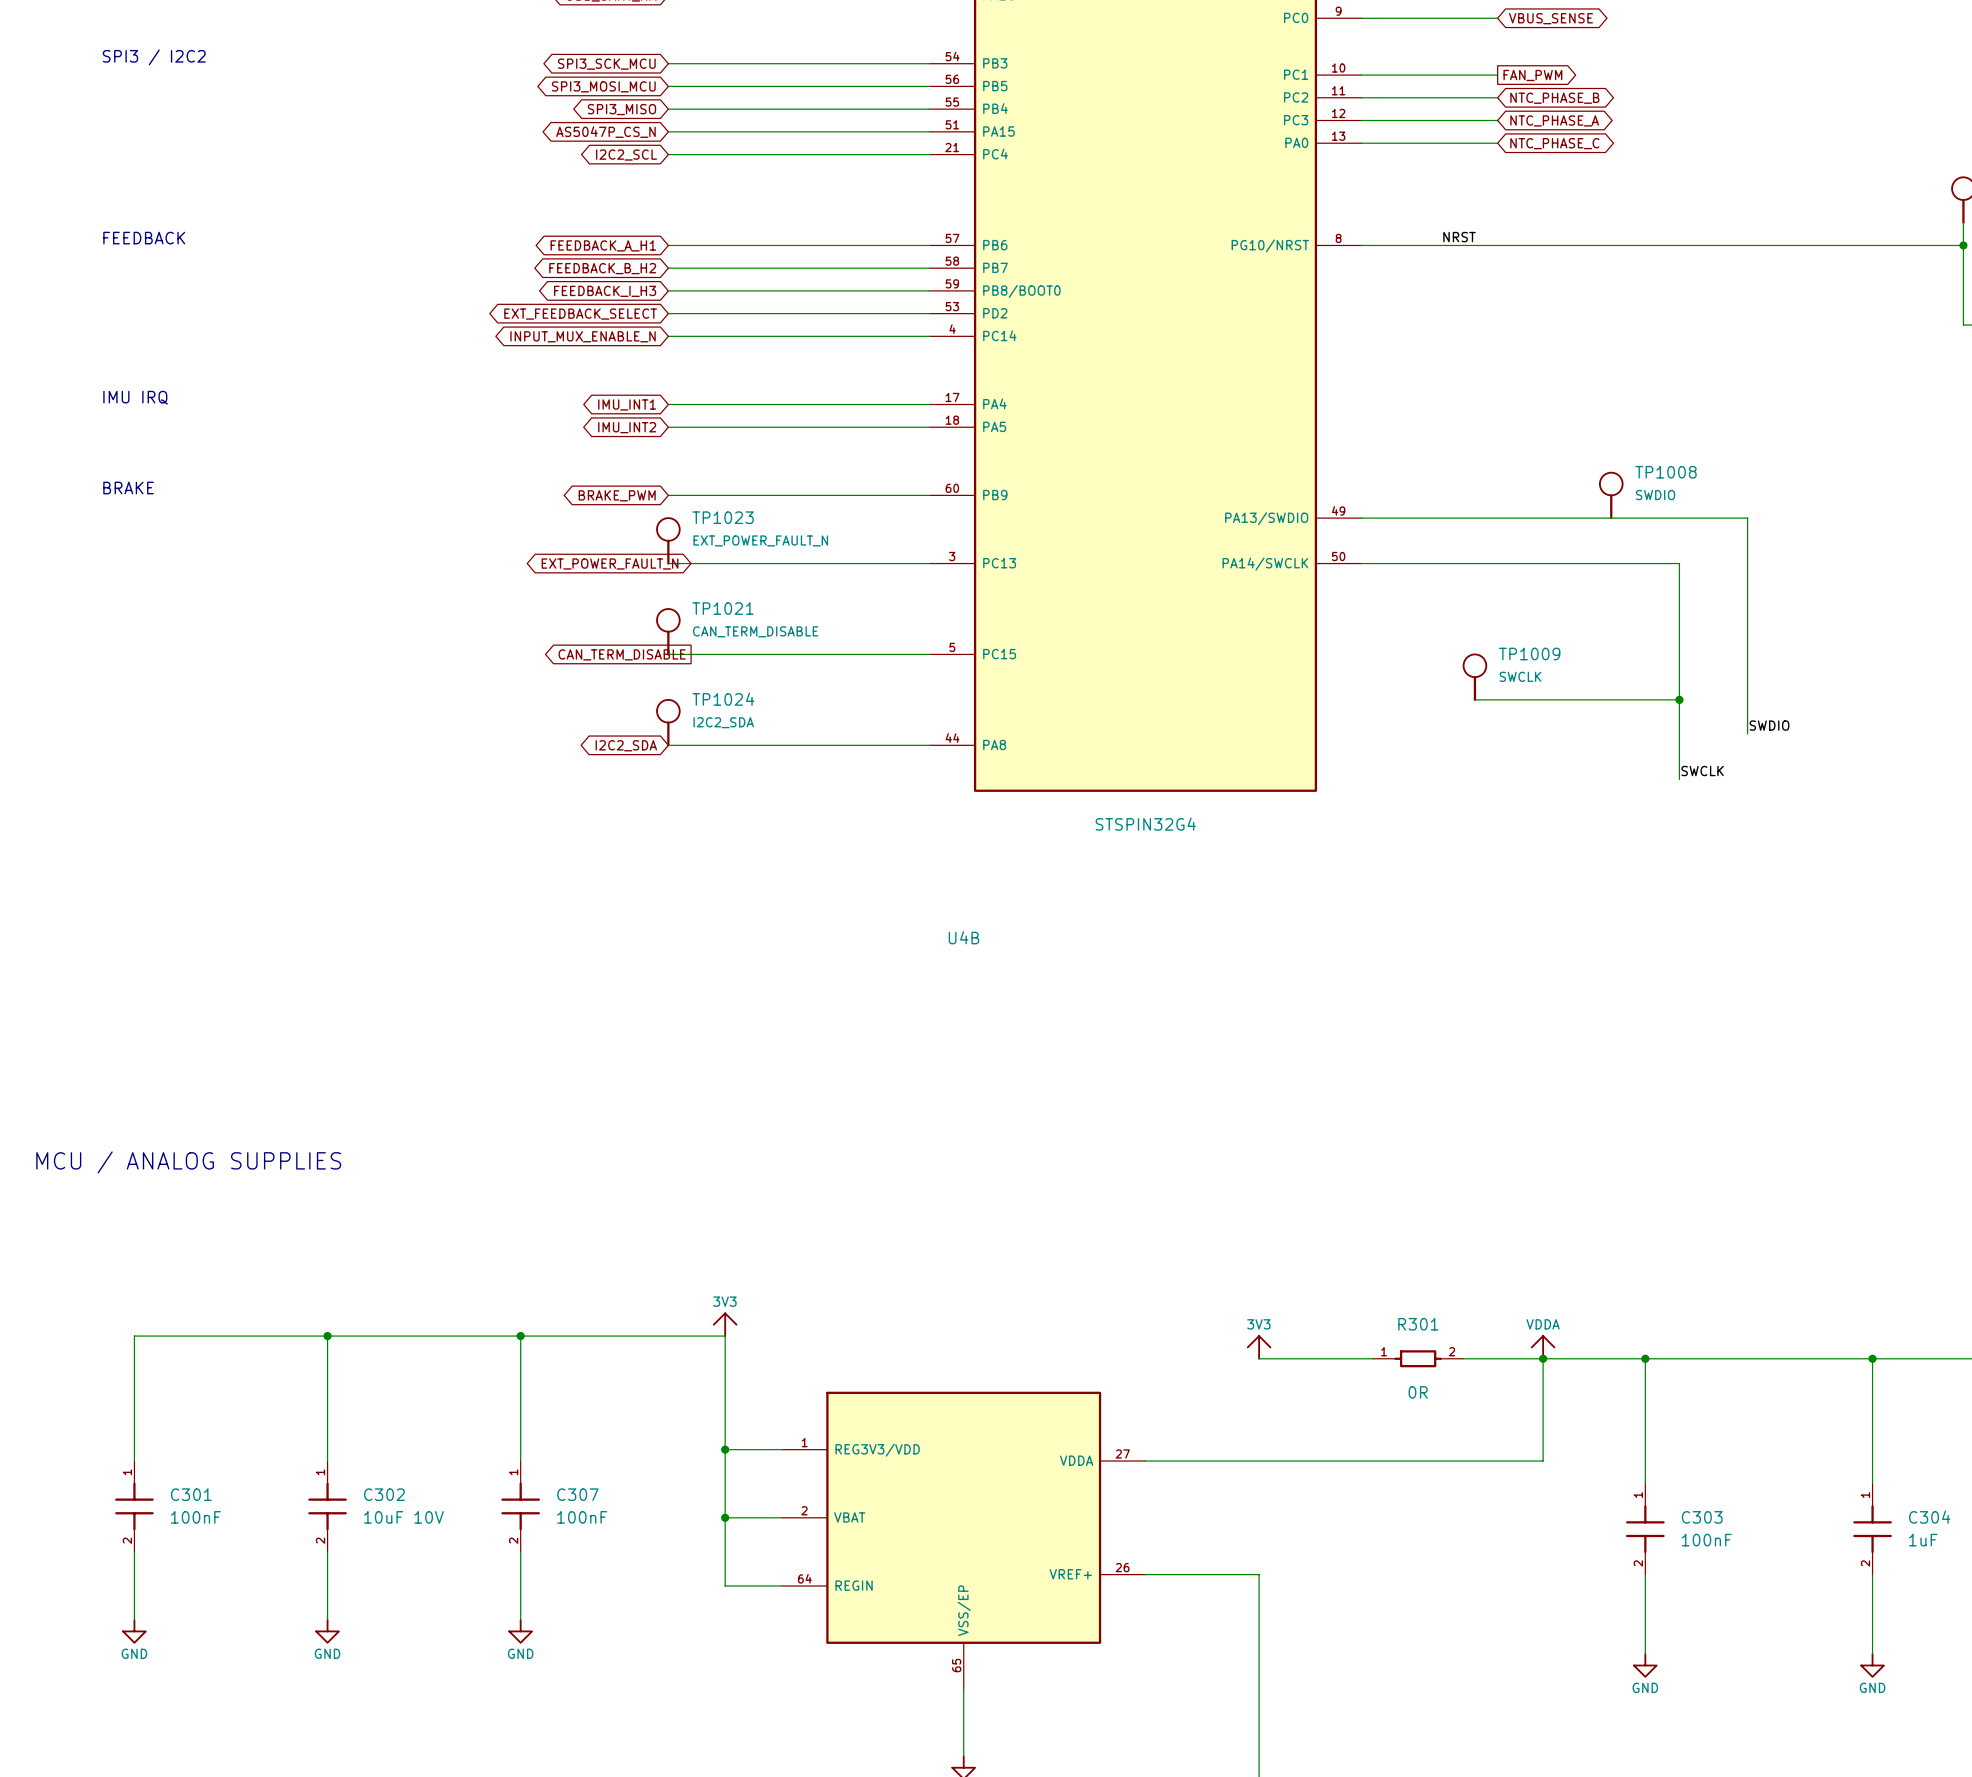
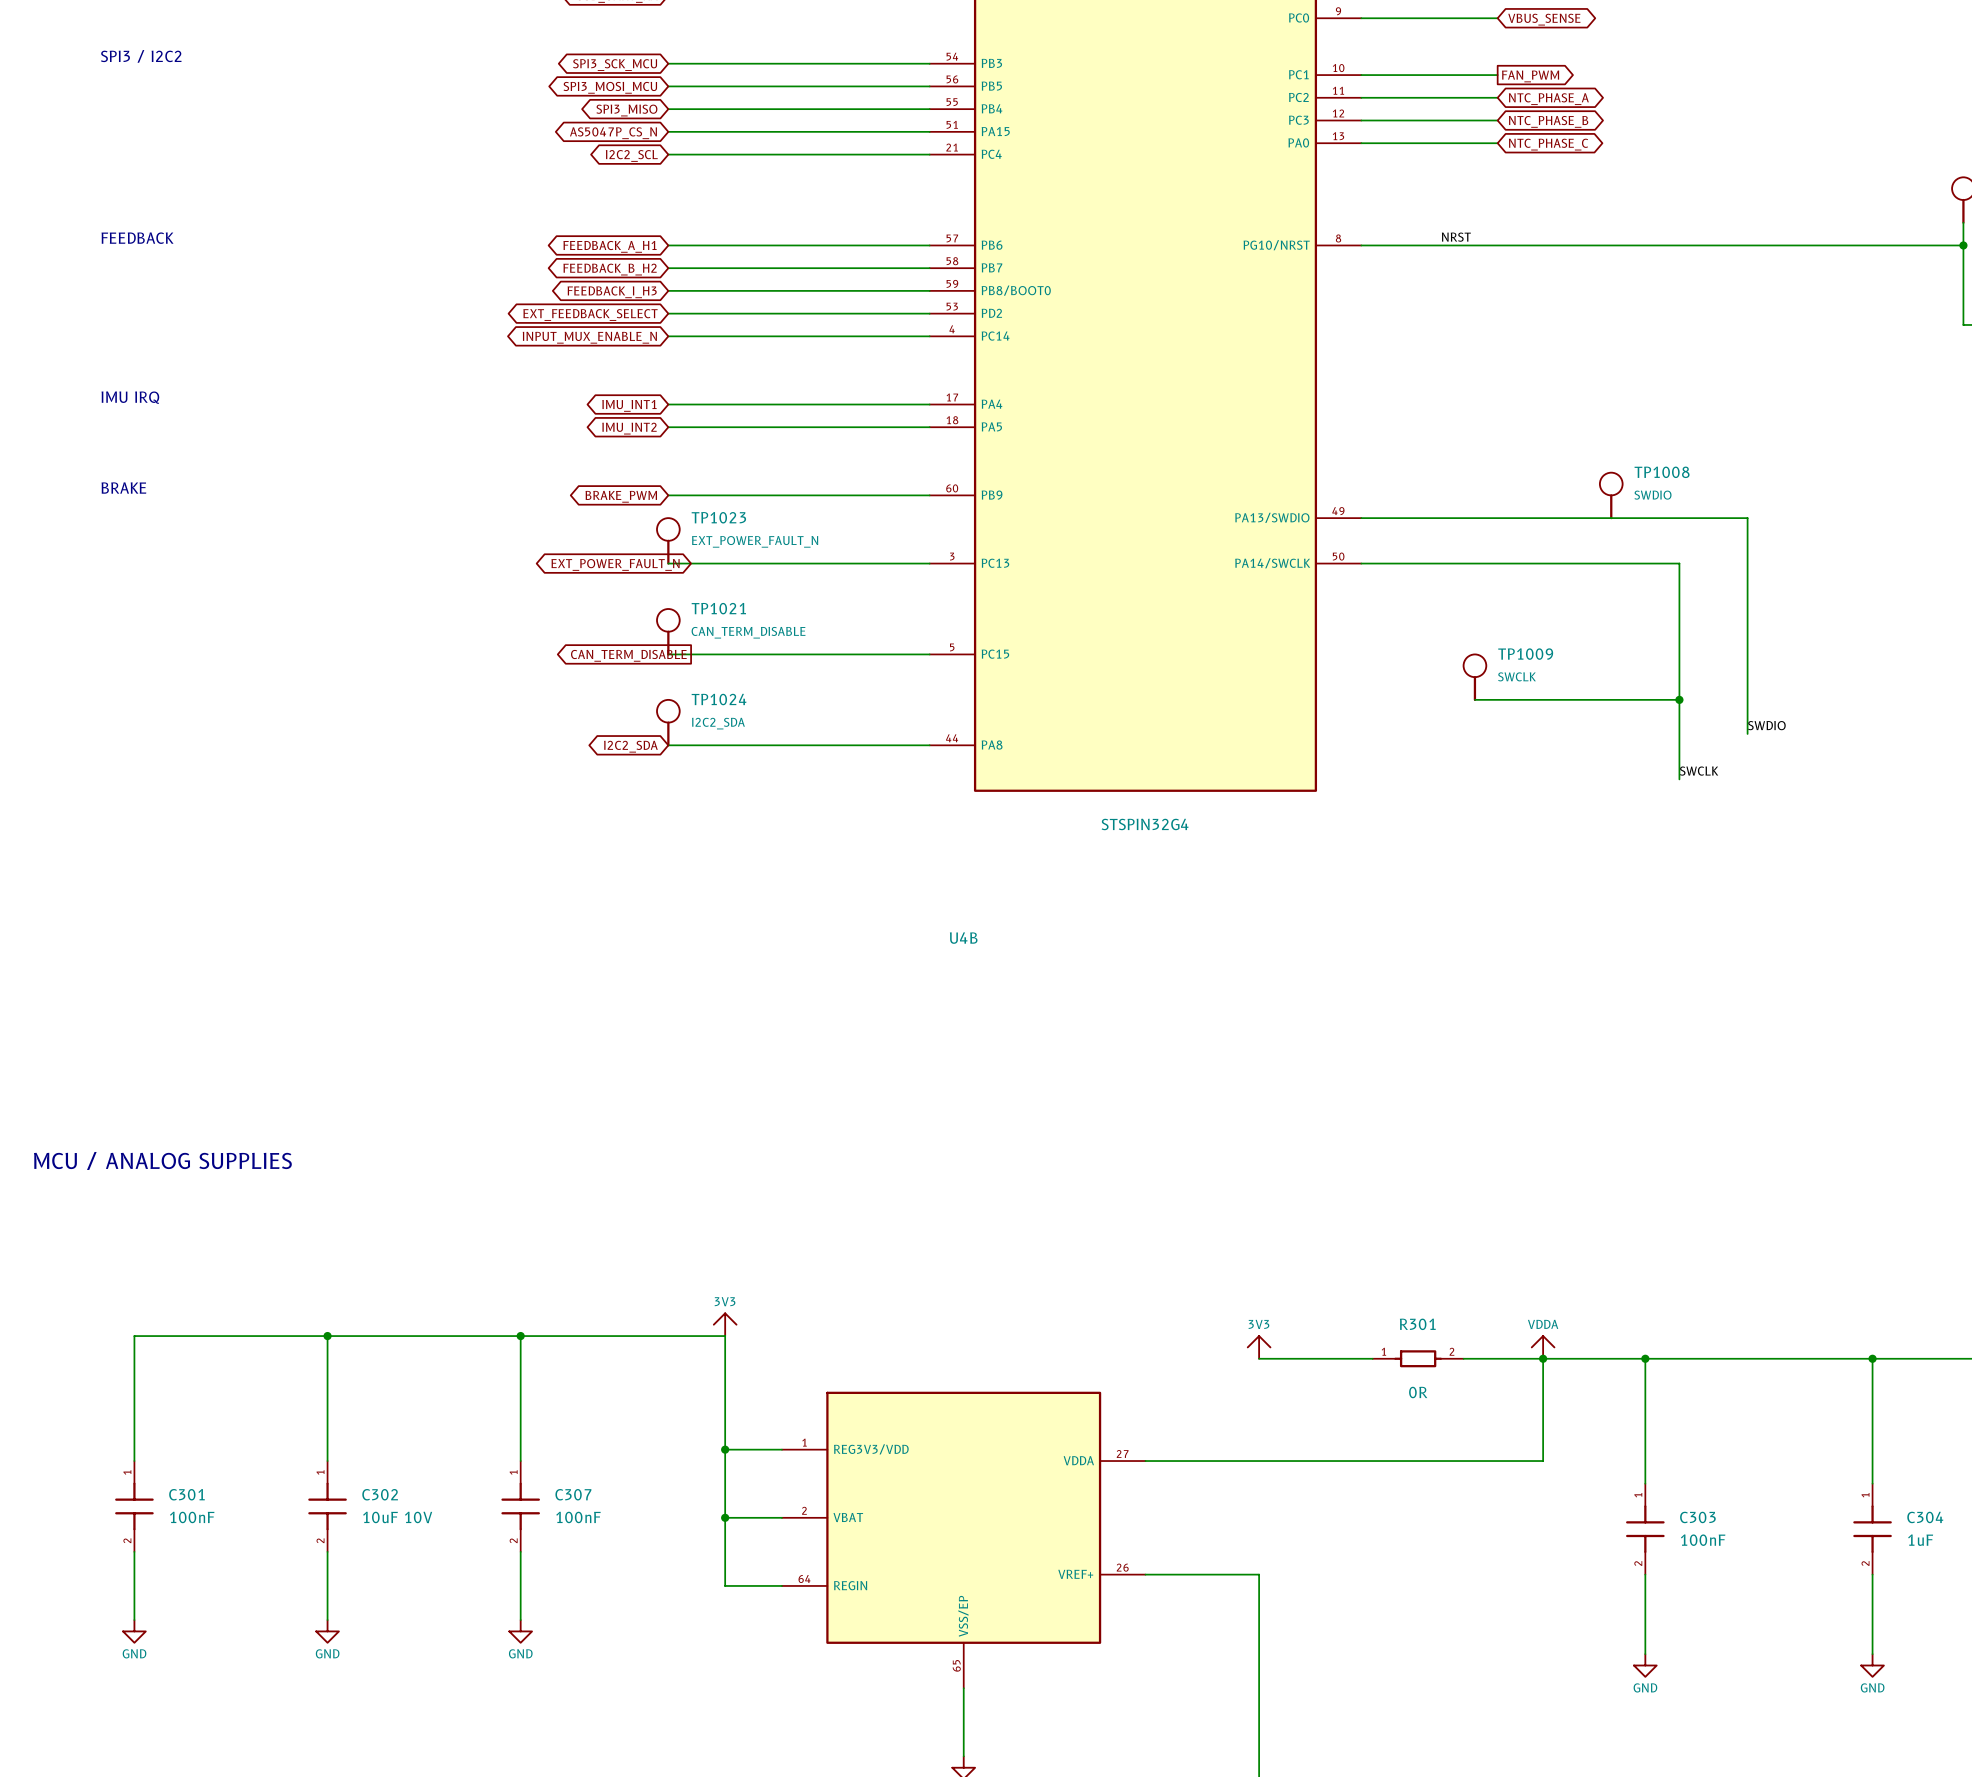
global label: NTC_PHASE_B (1554, 98) -> NTC_PHASE_A (1548, 99)
global label: NTC_PHASE_A (1554, 120) -> NTC_PHASE_B (1548, 121)

